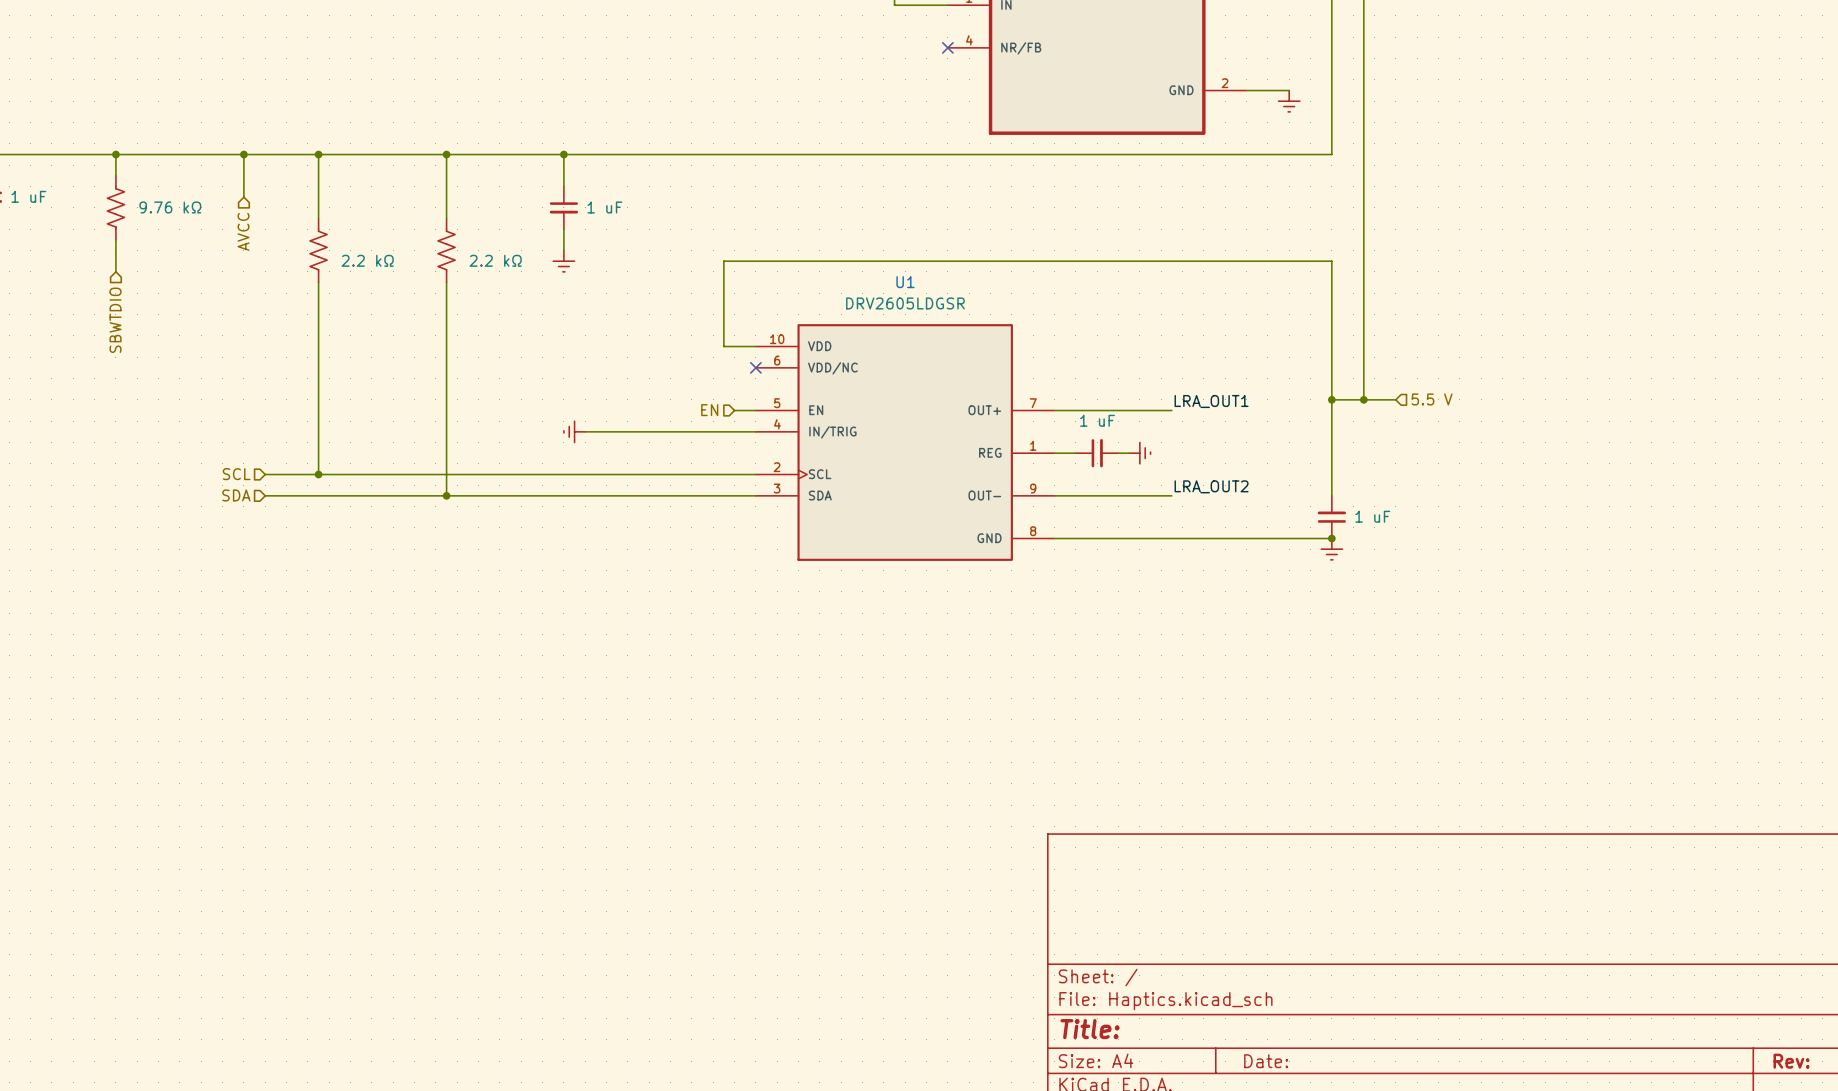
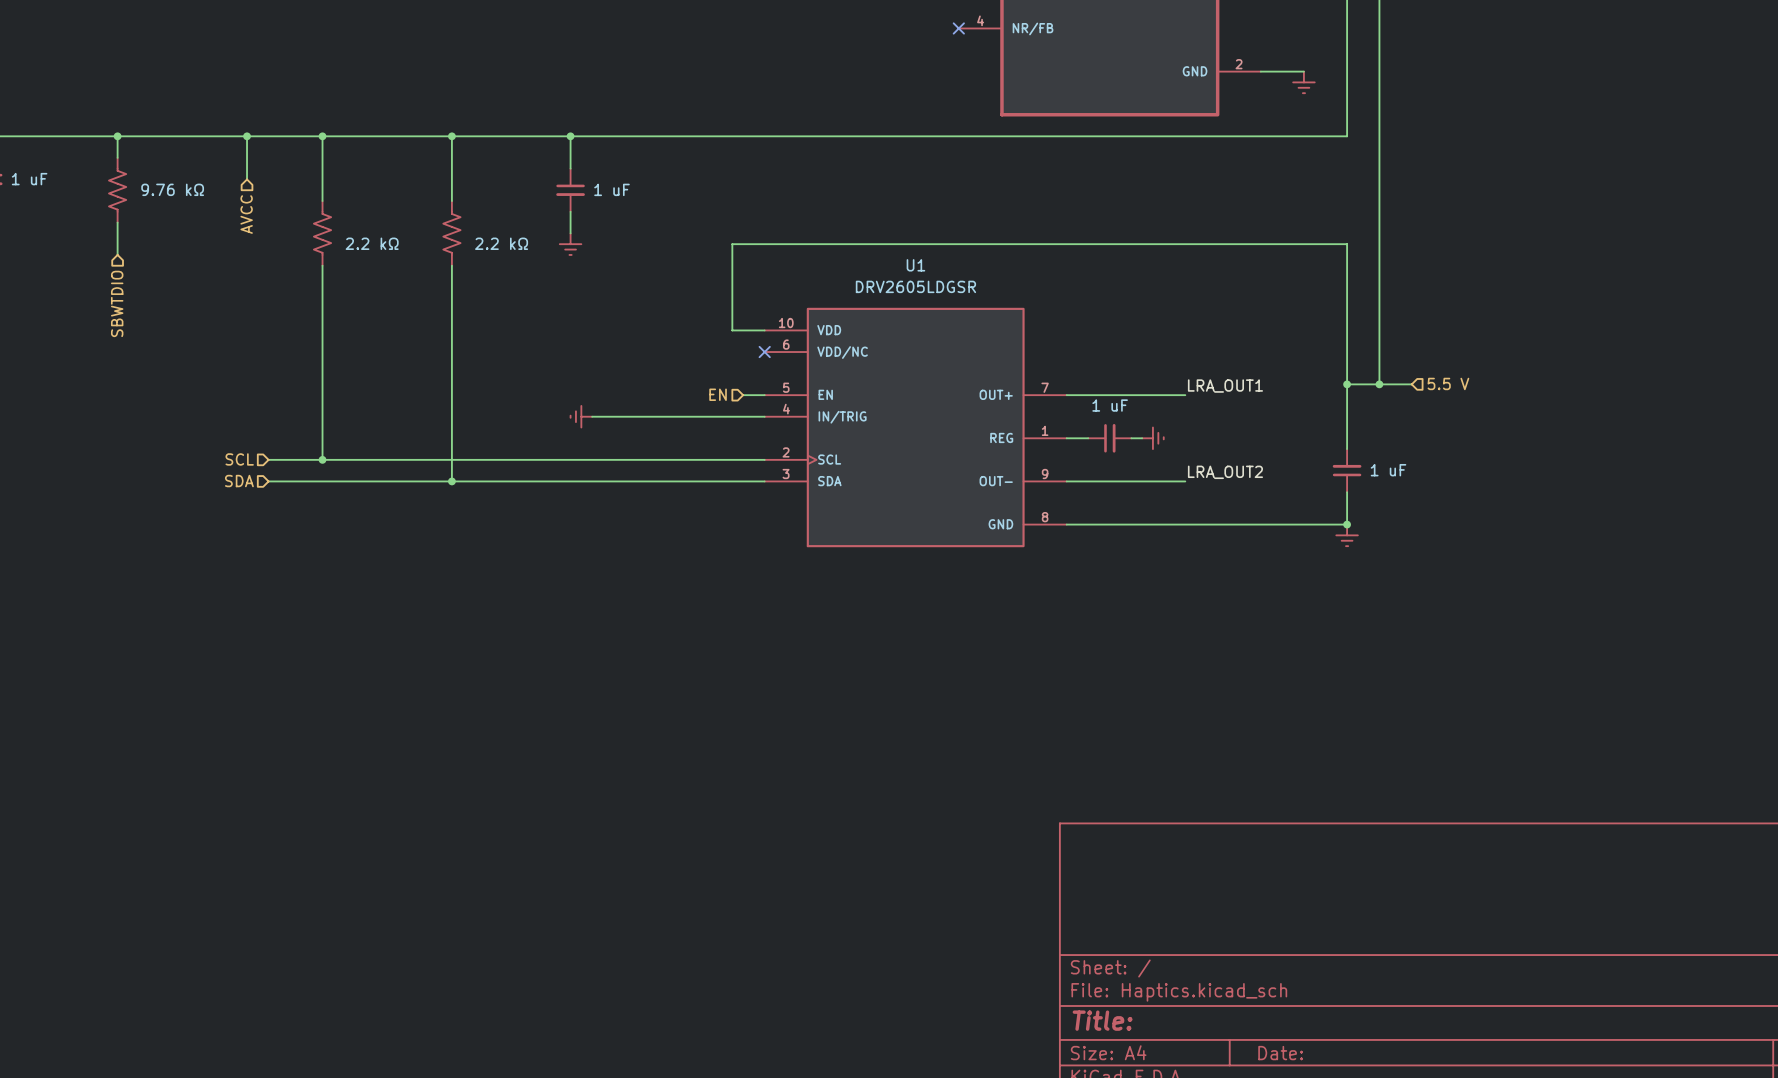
part position: (1331, 517) -> (1347, 470)

